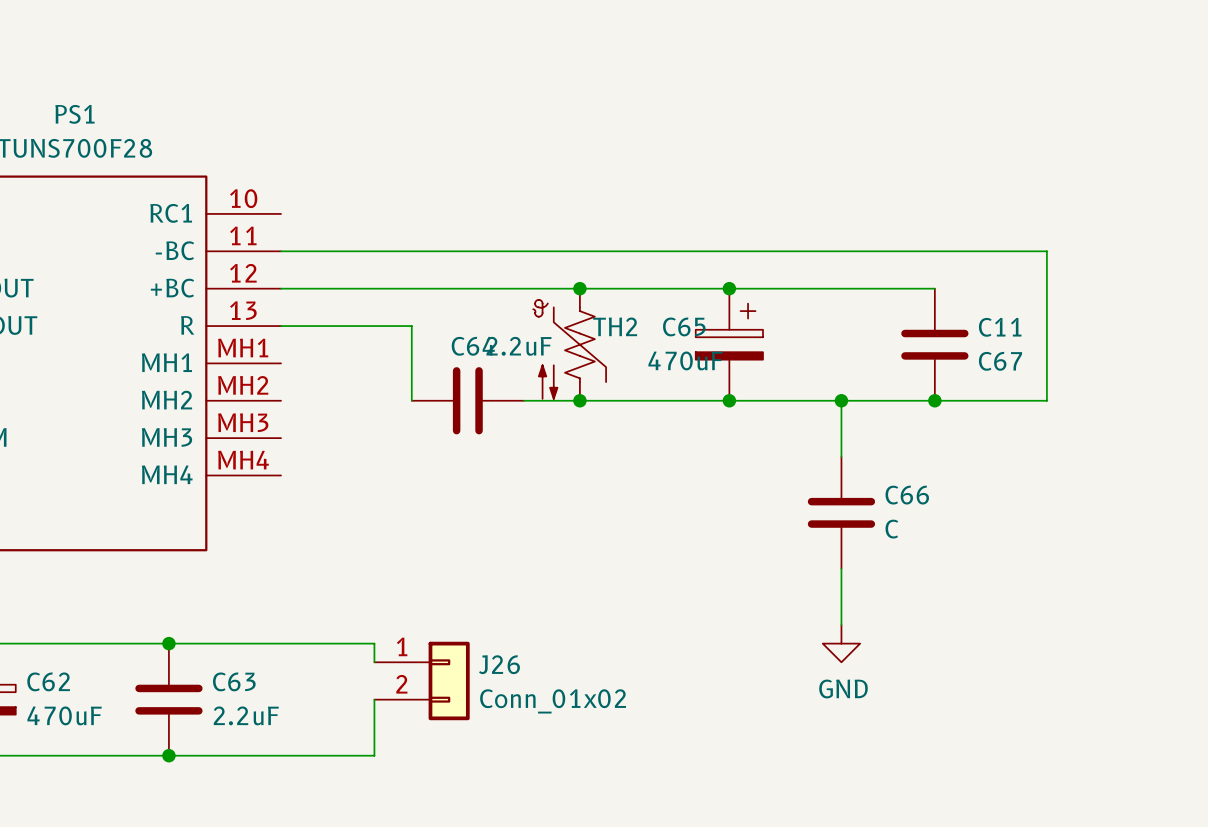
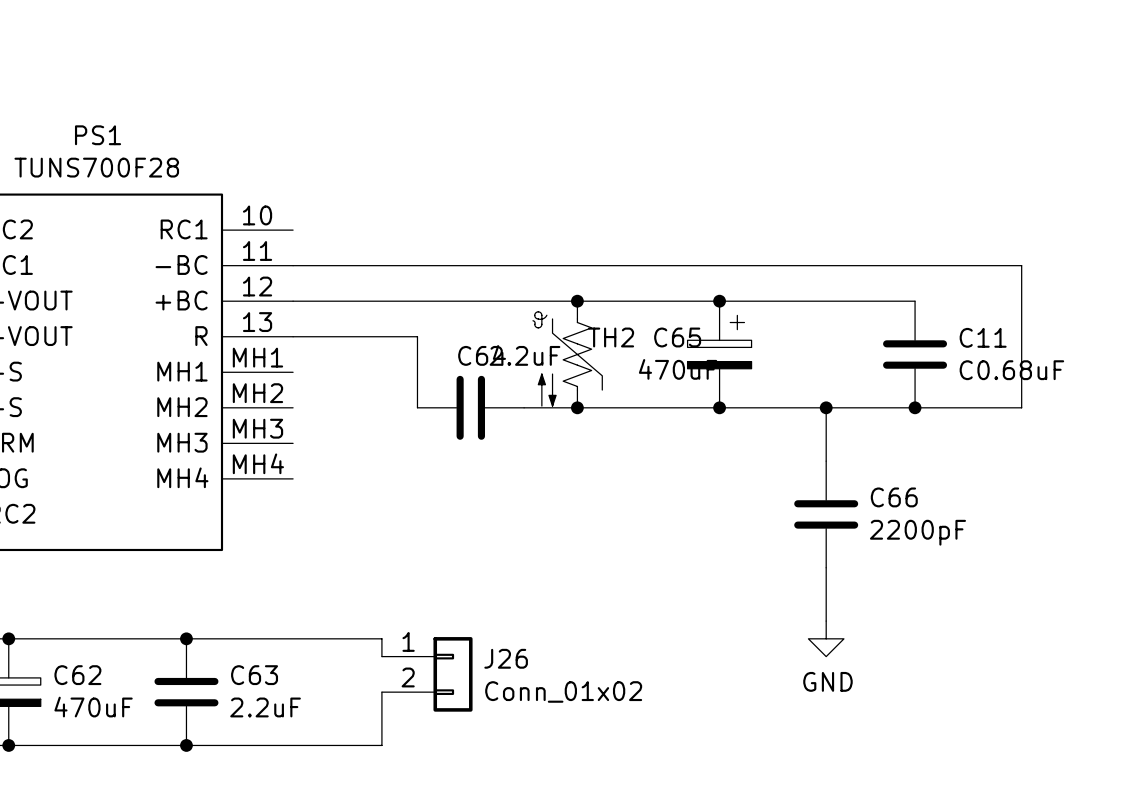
C67 name: C67 (1000, 361) -> C0.68uF (1011, 370)
C66 value: C (891, 529) -> 2200pF (917, 532)

